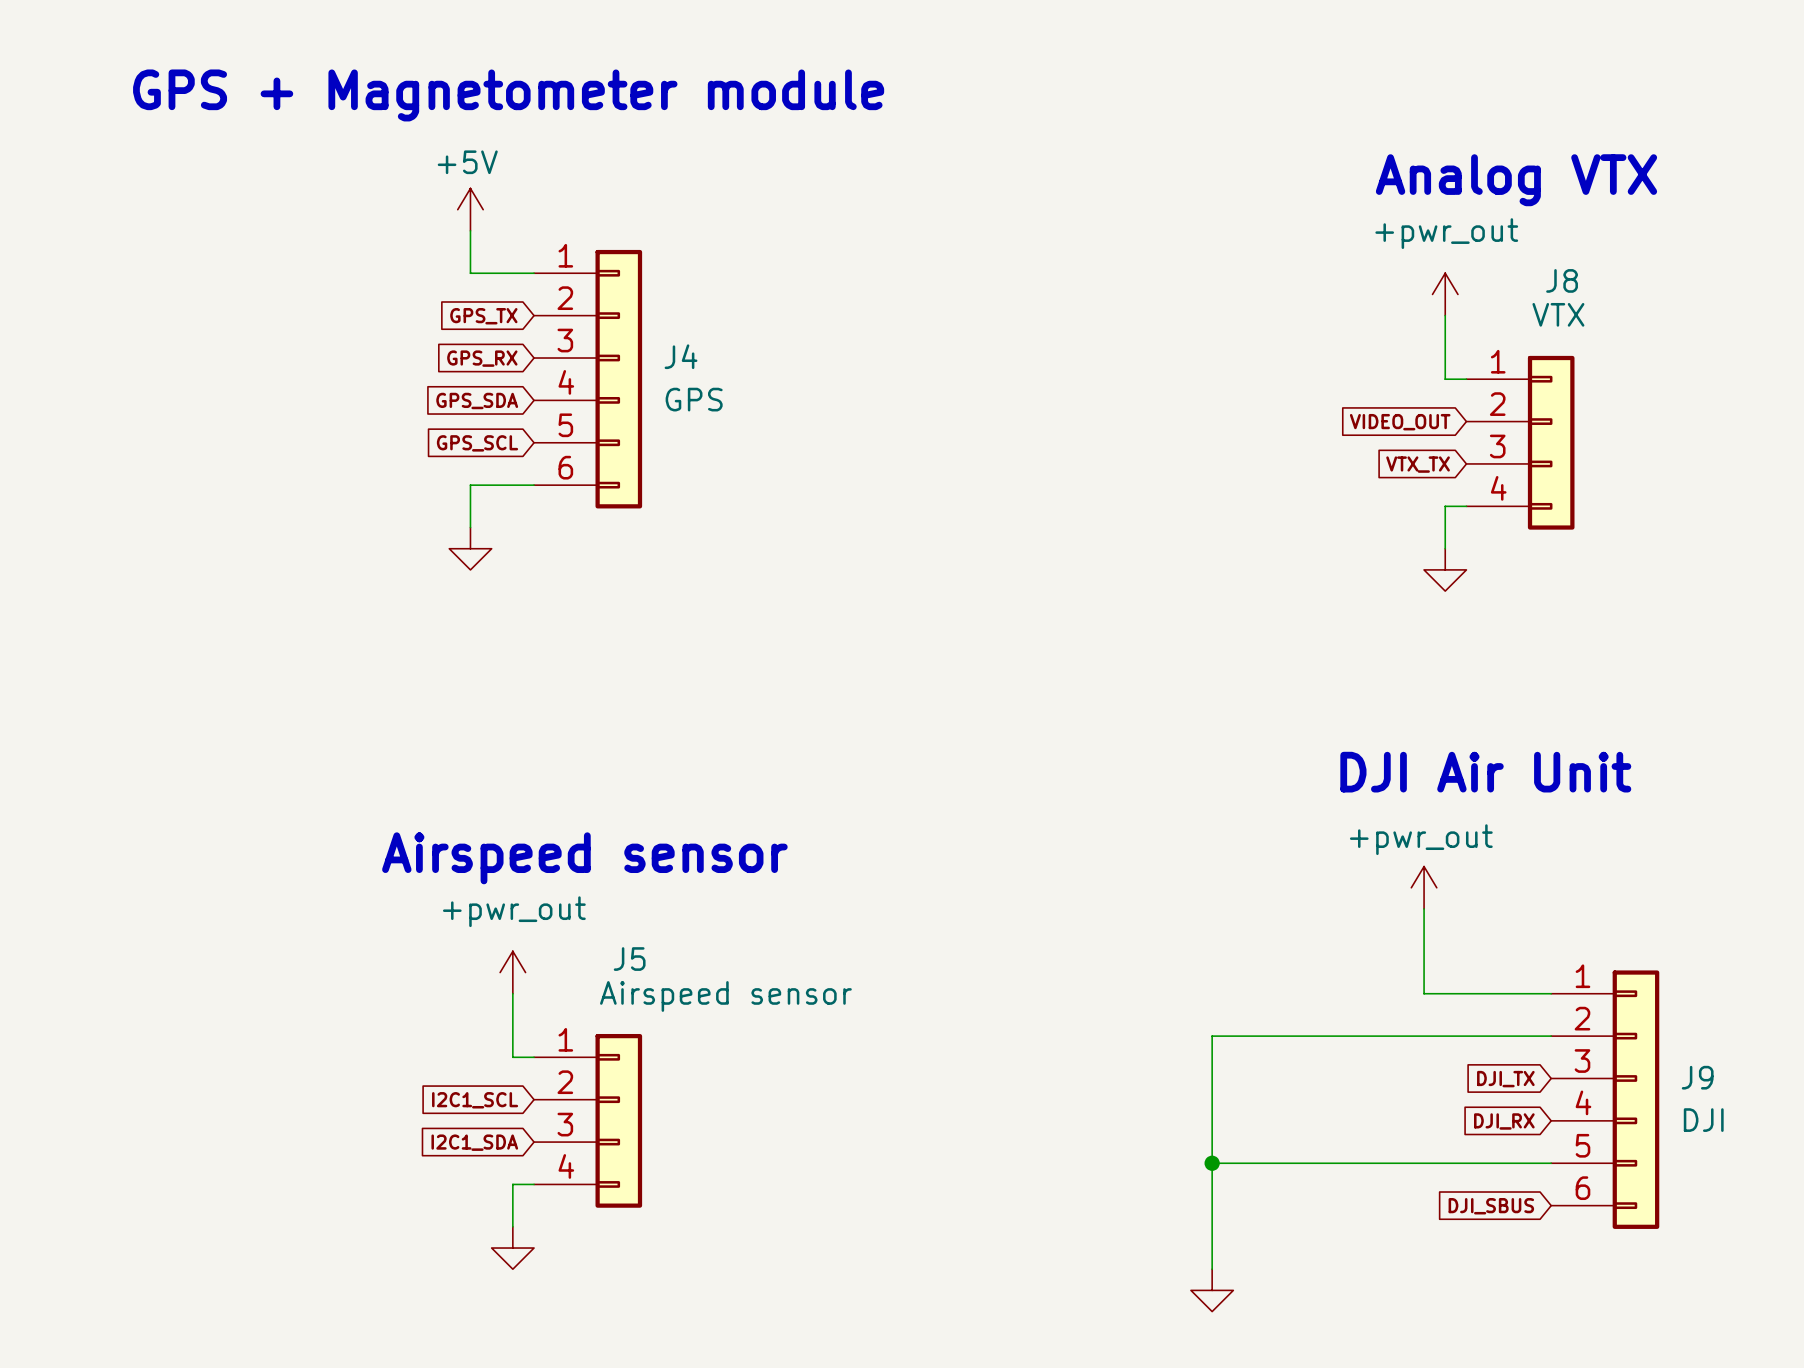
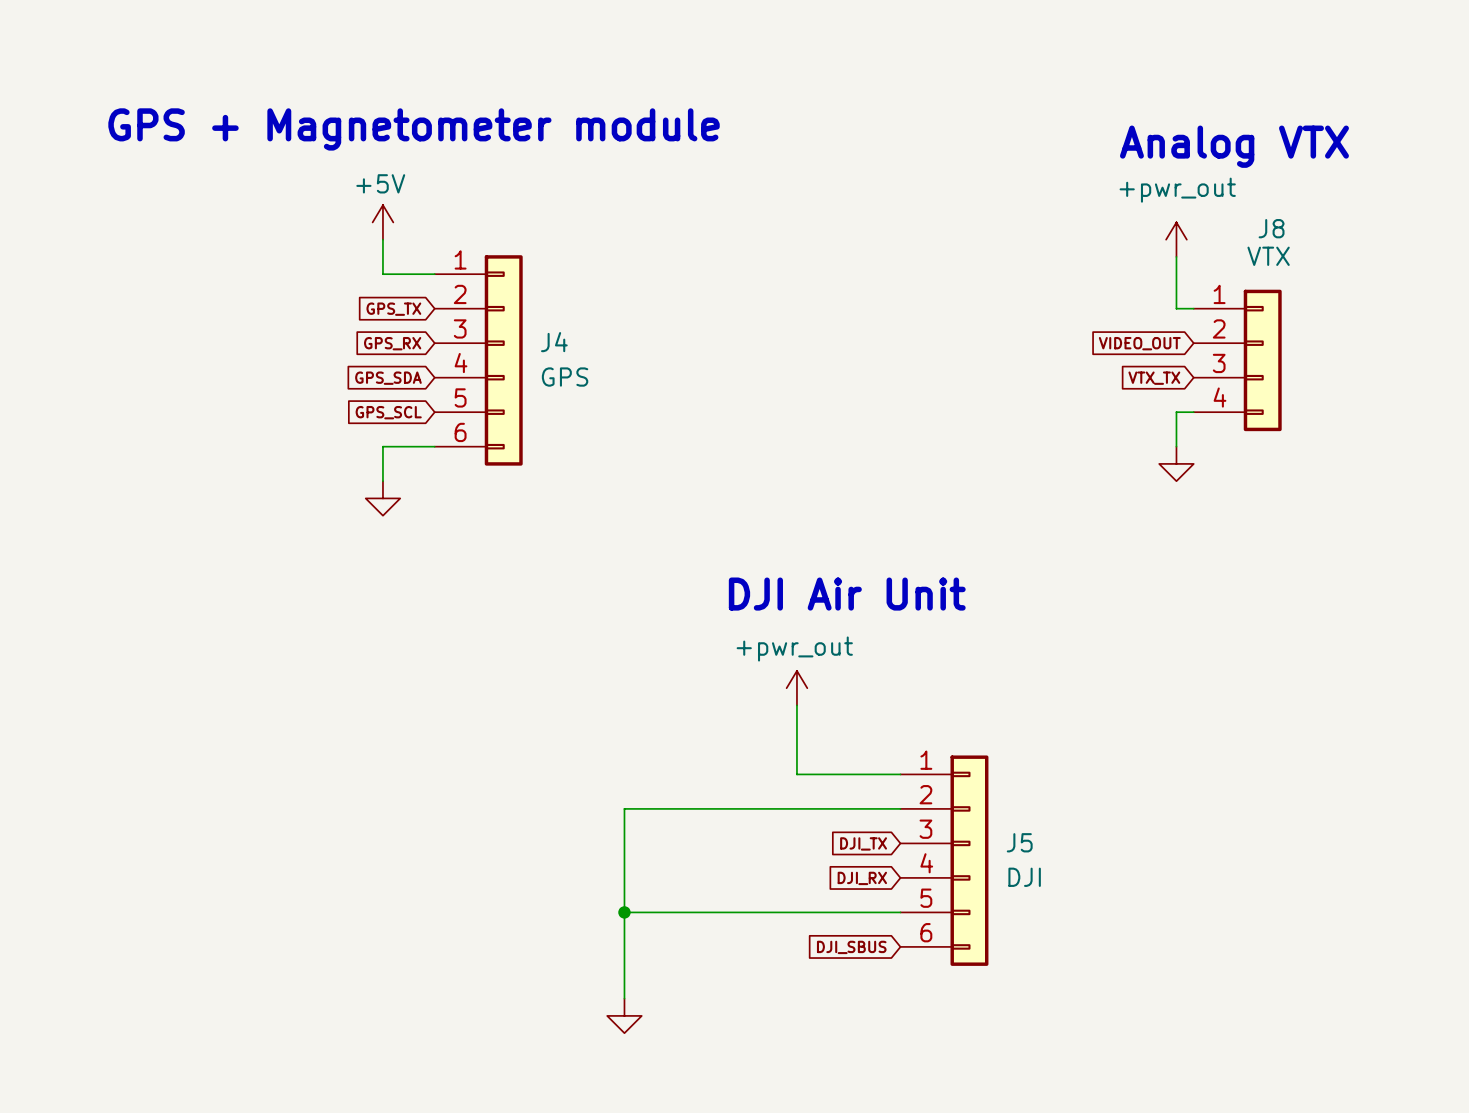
text position: GPS + Magnetometer module (508, 95) -> GPS + Magnetometer module (414, 129)
power symbol position: +5V (470, 209) -> +5V (382, 222)
wire: (470, 230) (470, 273) (534, 273) -> (382, 239) (382, 274) (434, 274)
global label position: GPS_TX (483, 316) -> GPS_TX (393, 309)
global label position: GPS_RX (482, 358) -> GPS_RX (392, 343)
J4 position: (588, 379) -> (478, 360)
global label position: GPS_SDA (477, 400) -> GPS_SDA (388, 378)
global label position: GPS_SCL (477, 443) -> GPS_SCL (388, 412)
wire: (534, 485) (470, 485) (470, 527) -> (434, 446) (382, 446) (382, 481)
power symbol position: (470, 548) -> (382, 498)
text: none -> DJI Air Unit (847, 594)
text: DJI Air Unit (1485, 772) -> none
power symbol: none -> +pwr_out (796, 688)
text: Airspeed sensor (584, 858) -> none
wire: none -> (796, 705) (796, 774) (900, 774)
power symbol: +pwr_out (1424, 887) -> none
wire: (1424, 908) (1424, 993) (1551, 993) -> none
J5 name position: J5 (629, 959) -> J5 (1019, 842)
power symbol: +pwr_out (512, 972) -> none
wire: (512, 993) (512, 1057) (534, 1057) -> none
wire: none -> (900, 808) (624, 808) (624, 998)
J5 value: Airspeed sensor (725, 996) -> DJI (1024, 877)
J5 symbol: [534, 1033, 643, 1208] -> [900, 755, 989, 966]
global label: none -> DJI_TX (863, 843)
wire: (1551, 1036) (1212, 1036) (1212, 1269) -> none
global label: none -> DJI_RX (862, 878)
global label: DJI_TX (1505, 1079) -> none
J9: DJI (1605, 1099) -> none
global label: I2C1_SCL (475, 1100) -> none
wire: none -> (624, 912) (900, 912)
junction: none -> (624, 912)
global label: DJI_RX (1504, 1121) -> none
global label: I2C1_SDA (474, 1142) -> none
global label: none -> DJI_SBUS (851, 947)
wire: (1212, 1163) (1551, 1163) -> none
junction: (1212, 1163) -> none
wire: (534, 1184) (512, 1184) (512, 1226) -> none
global label: DJI_SBUS (1491, 1206) -> none
power symbol: (512, 1248) -> none
power symbol: none -> (624, 1015)
power symbol: (1212, 1290) -> none

